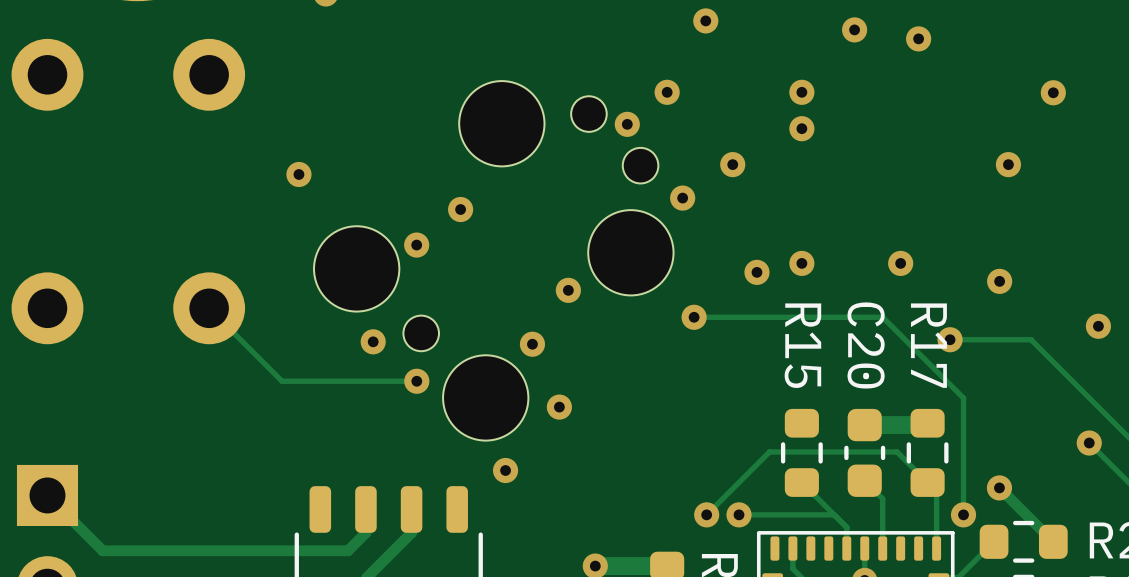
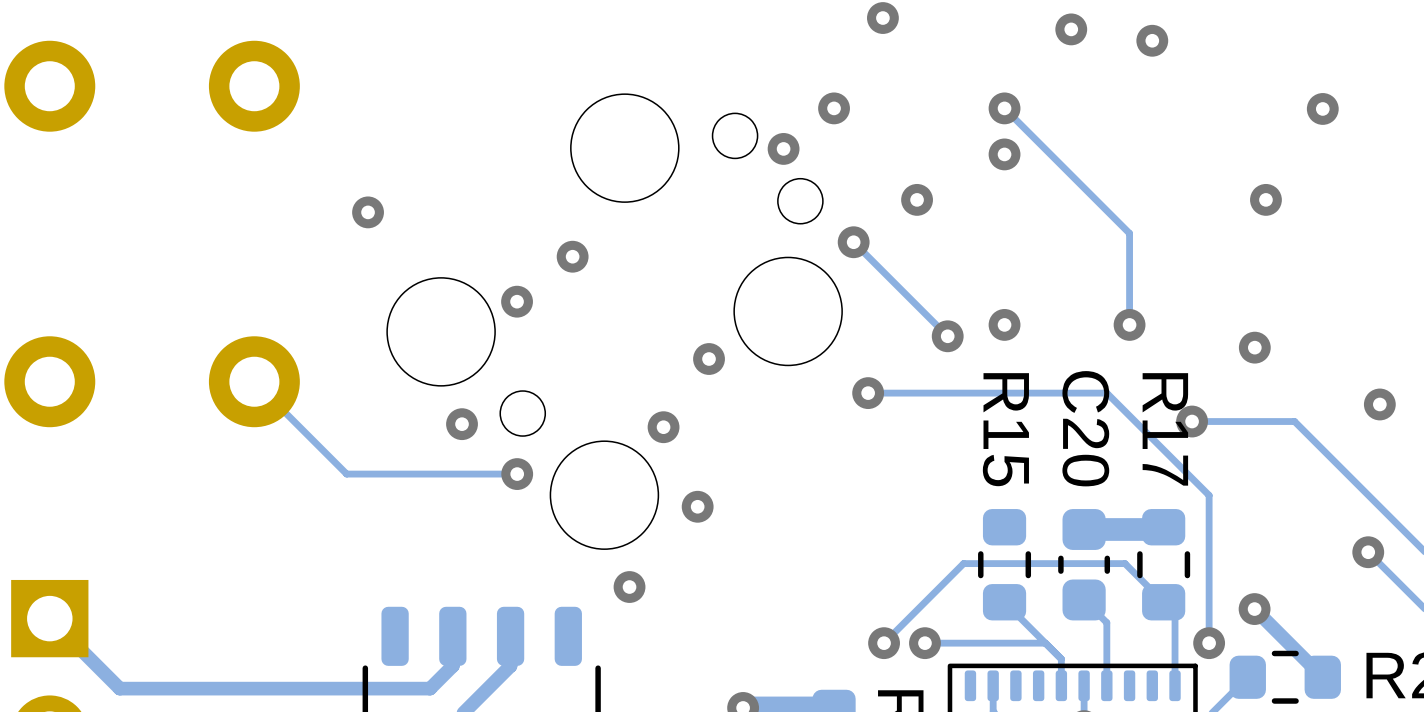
track: none -> (1004, 108) (1129, 233) (1129, 324)
track: none -> (853, 242) (947, 336)

